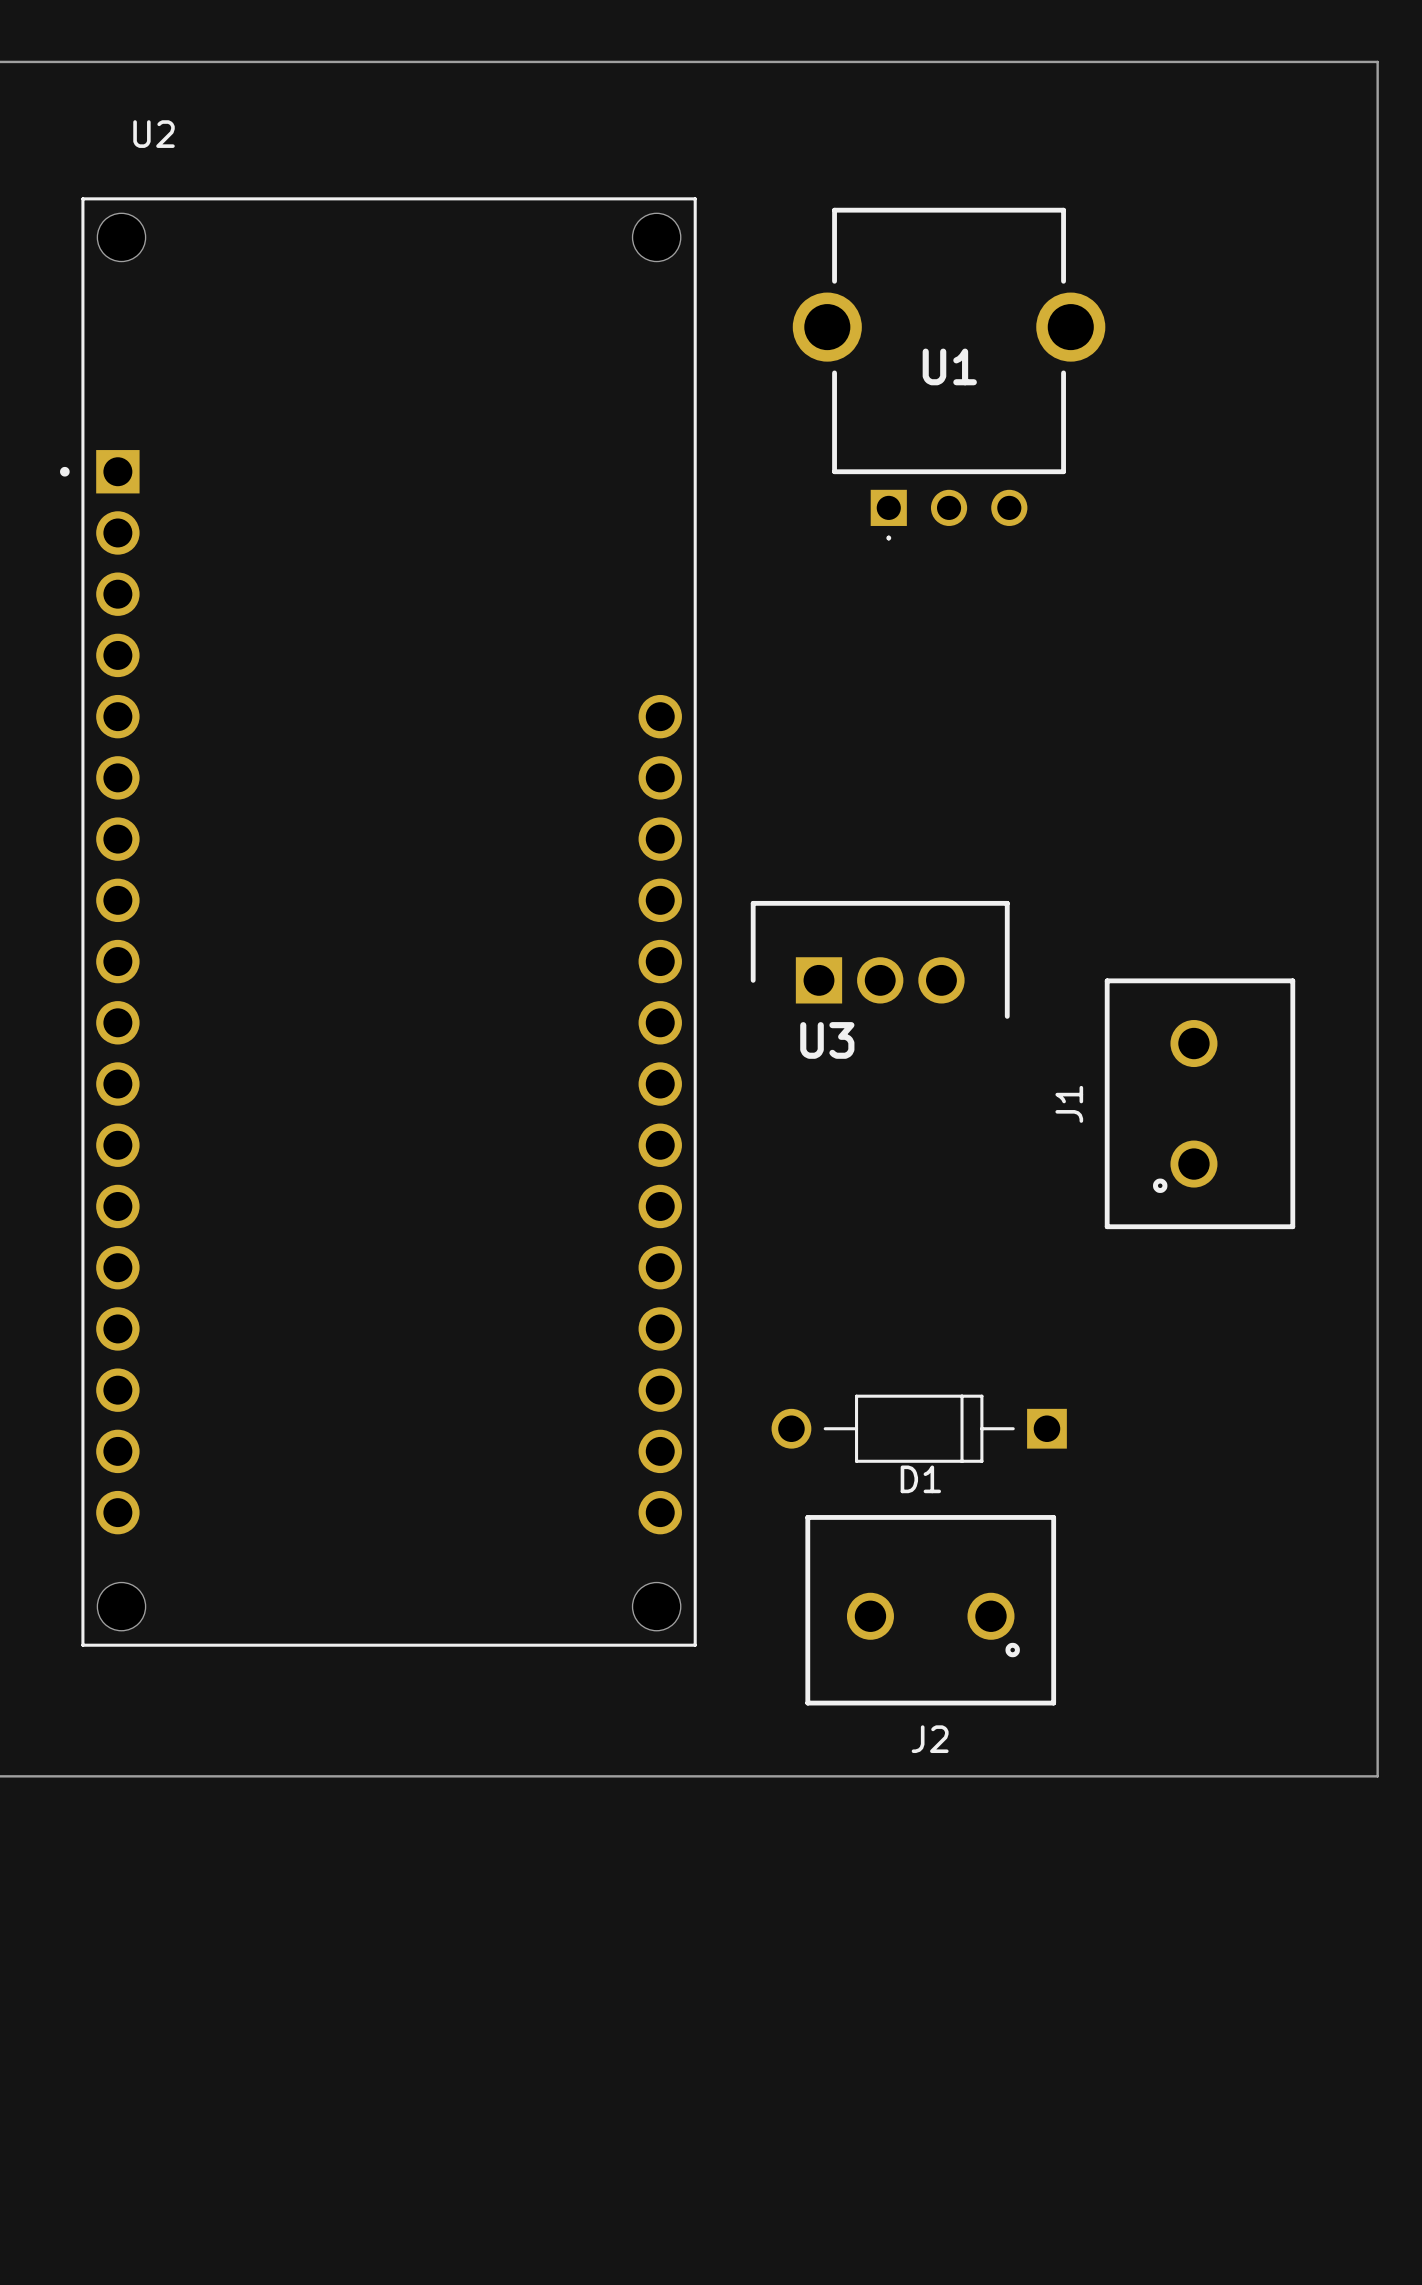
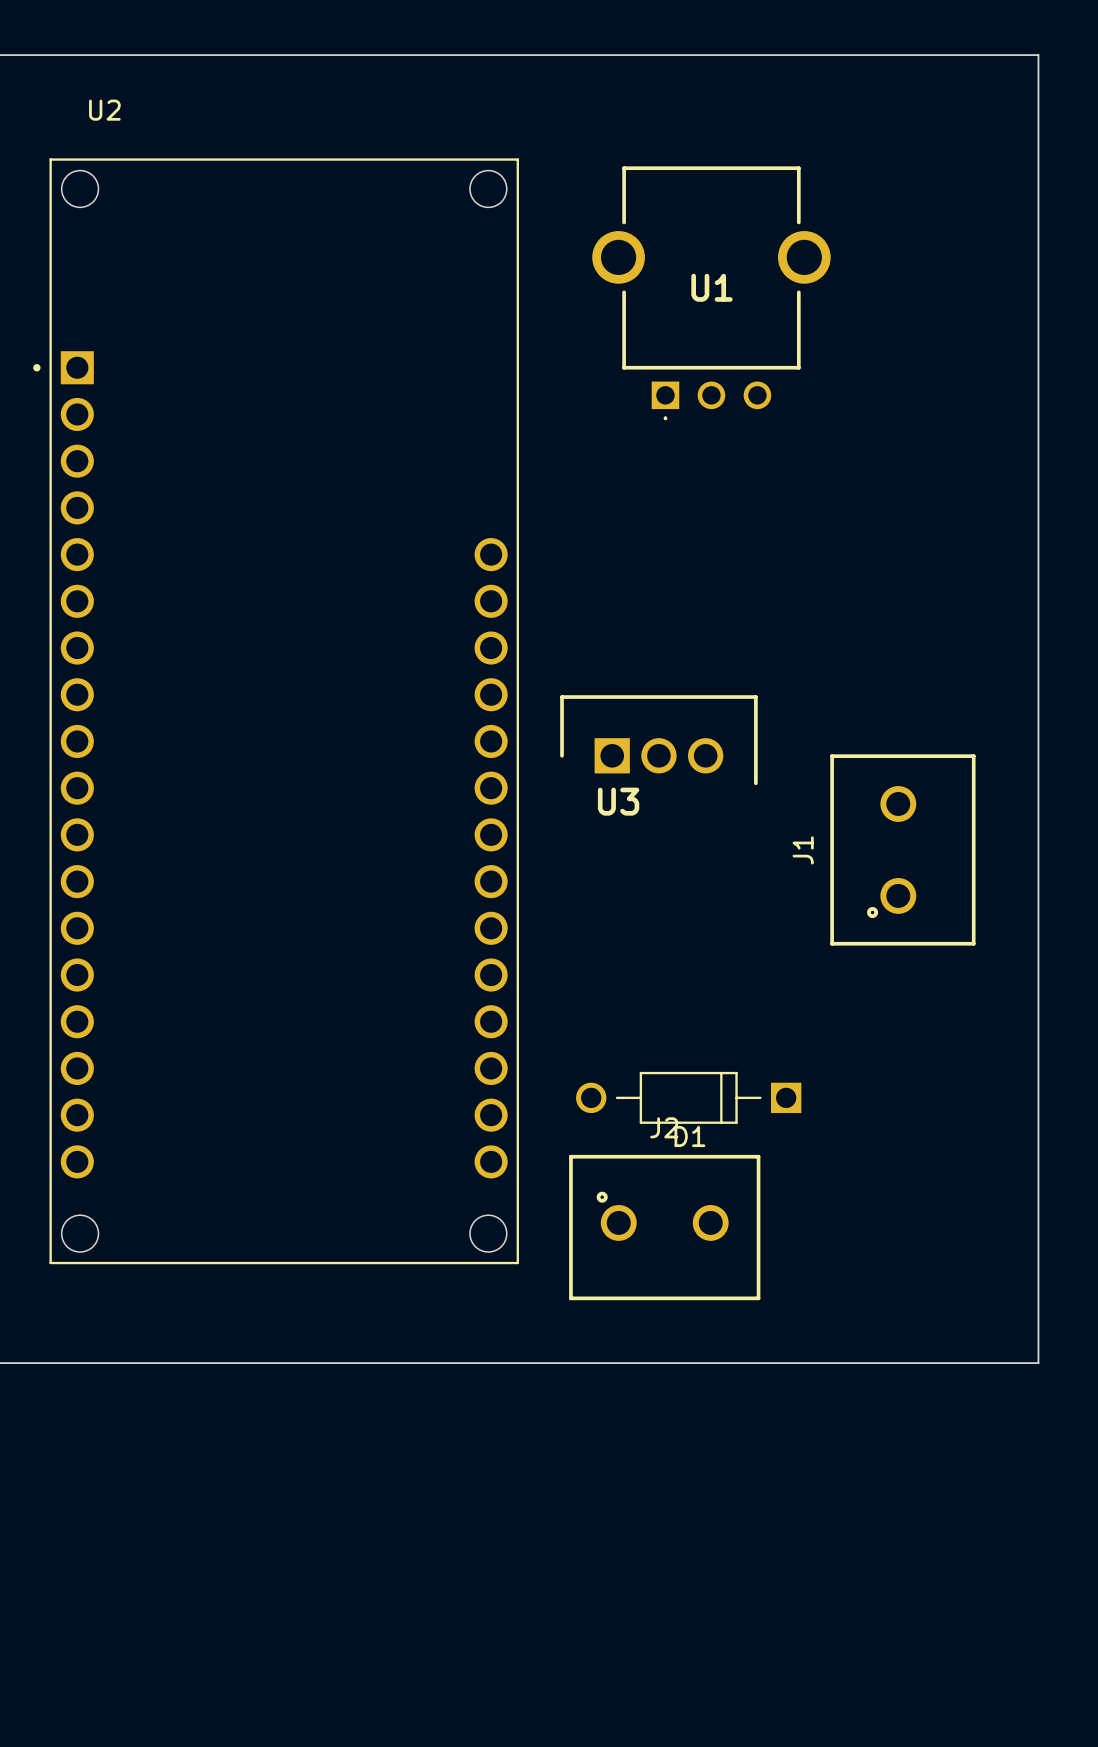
J2 rotation: 0° (930, 1610) -> 180° (664, 1227)

